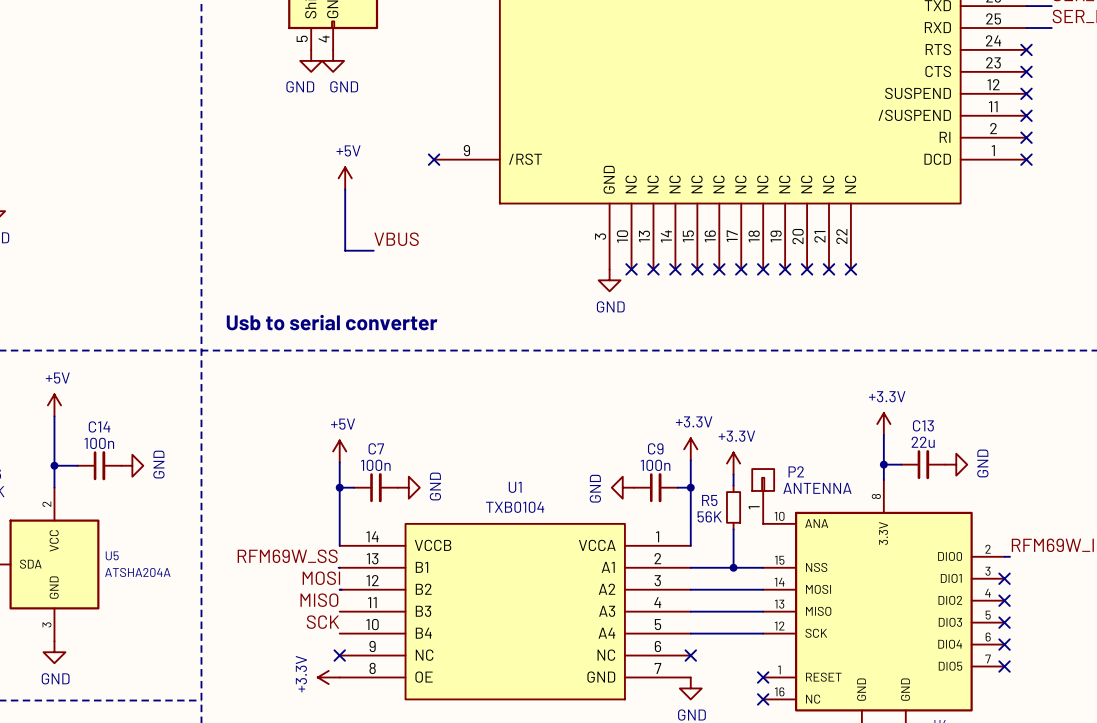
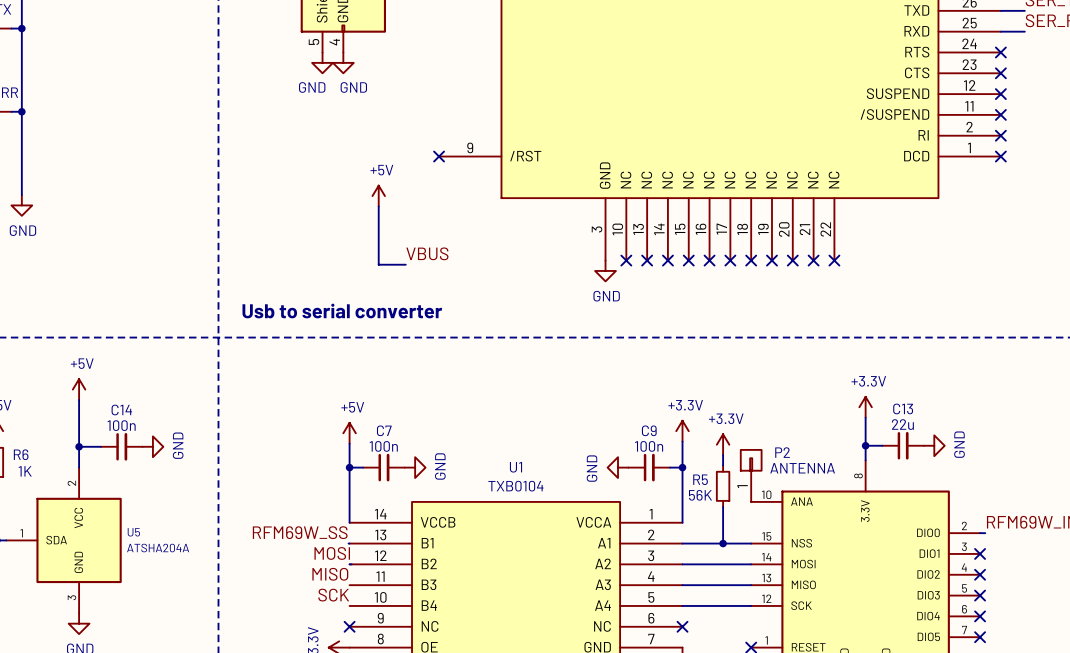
power symbol position: +5V (345, 178) -> +5V (378, 196)
wire: (345, 189) (345, 250) (373, 250) -> (378, 206) (378, 264) (405, 264)
label position: VBUS (396, 239) -> VBUS (427, 253)

